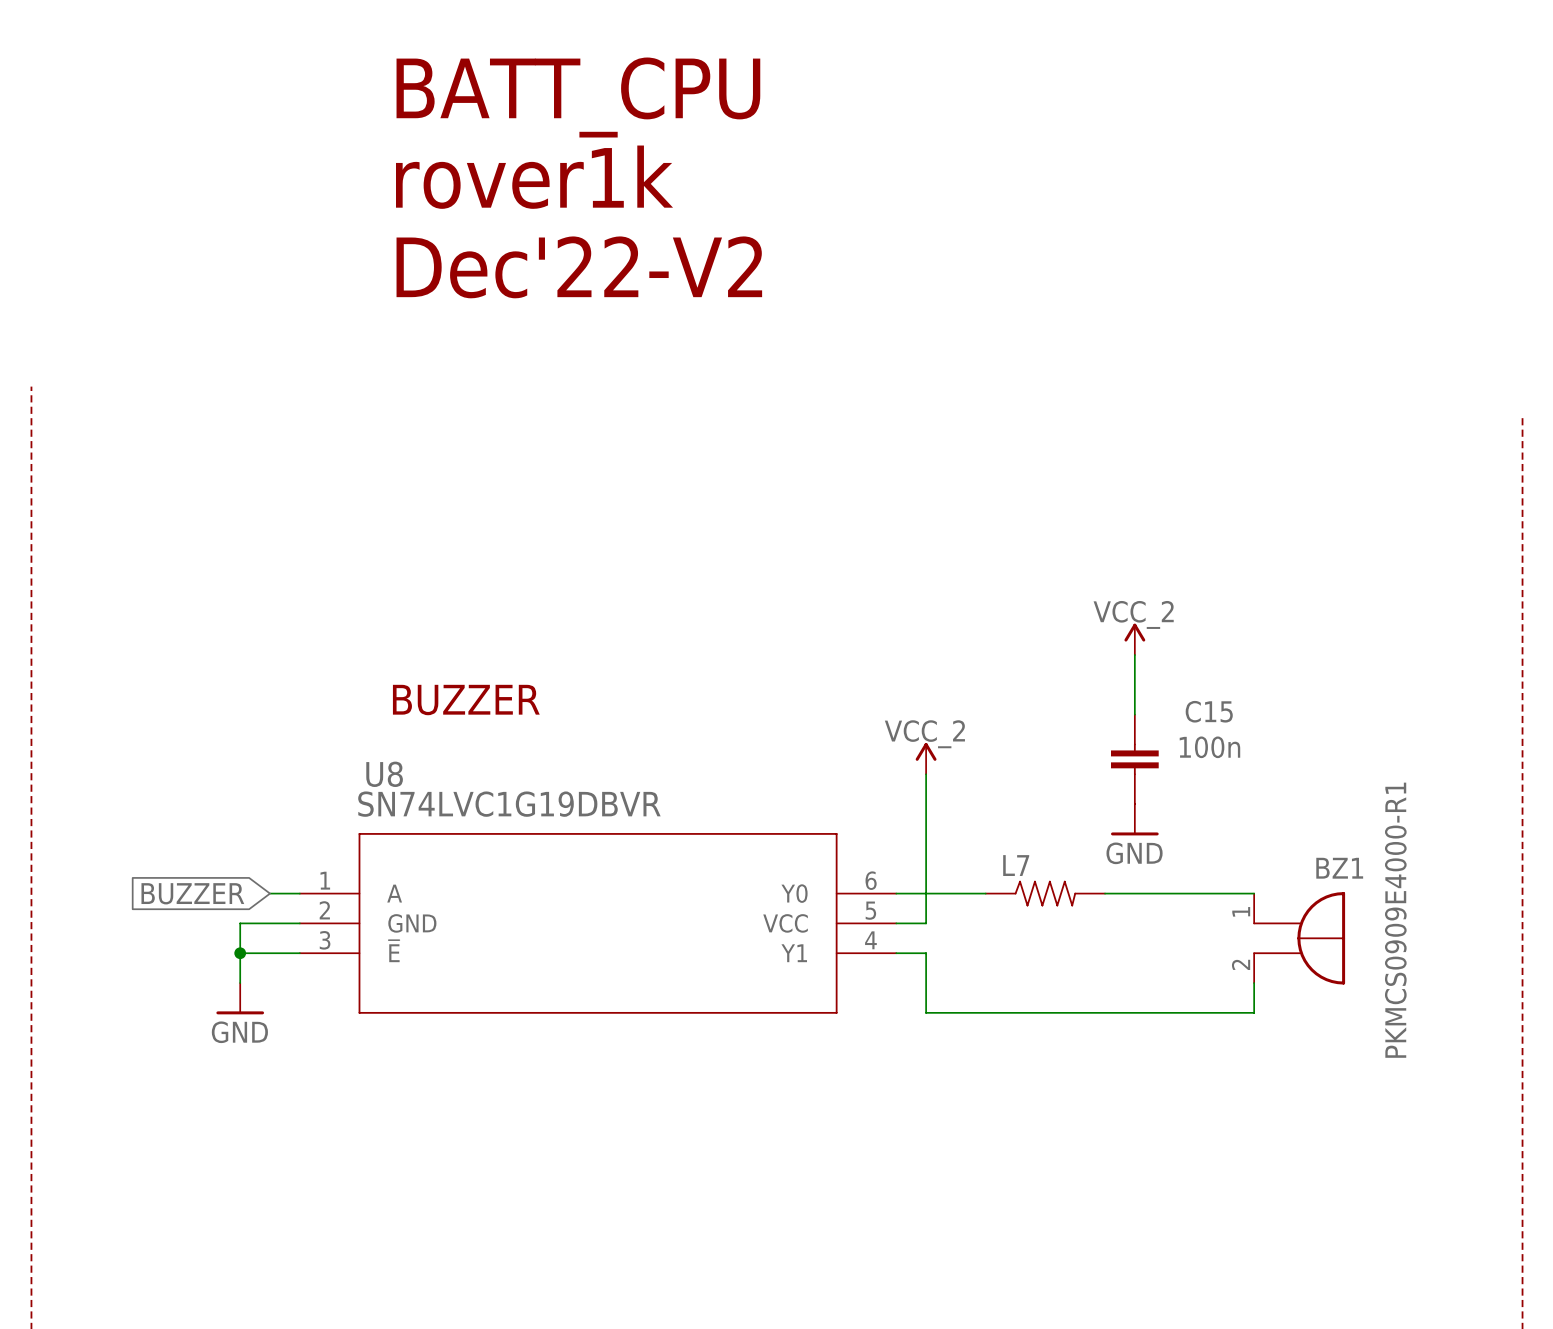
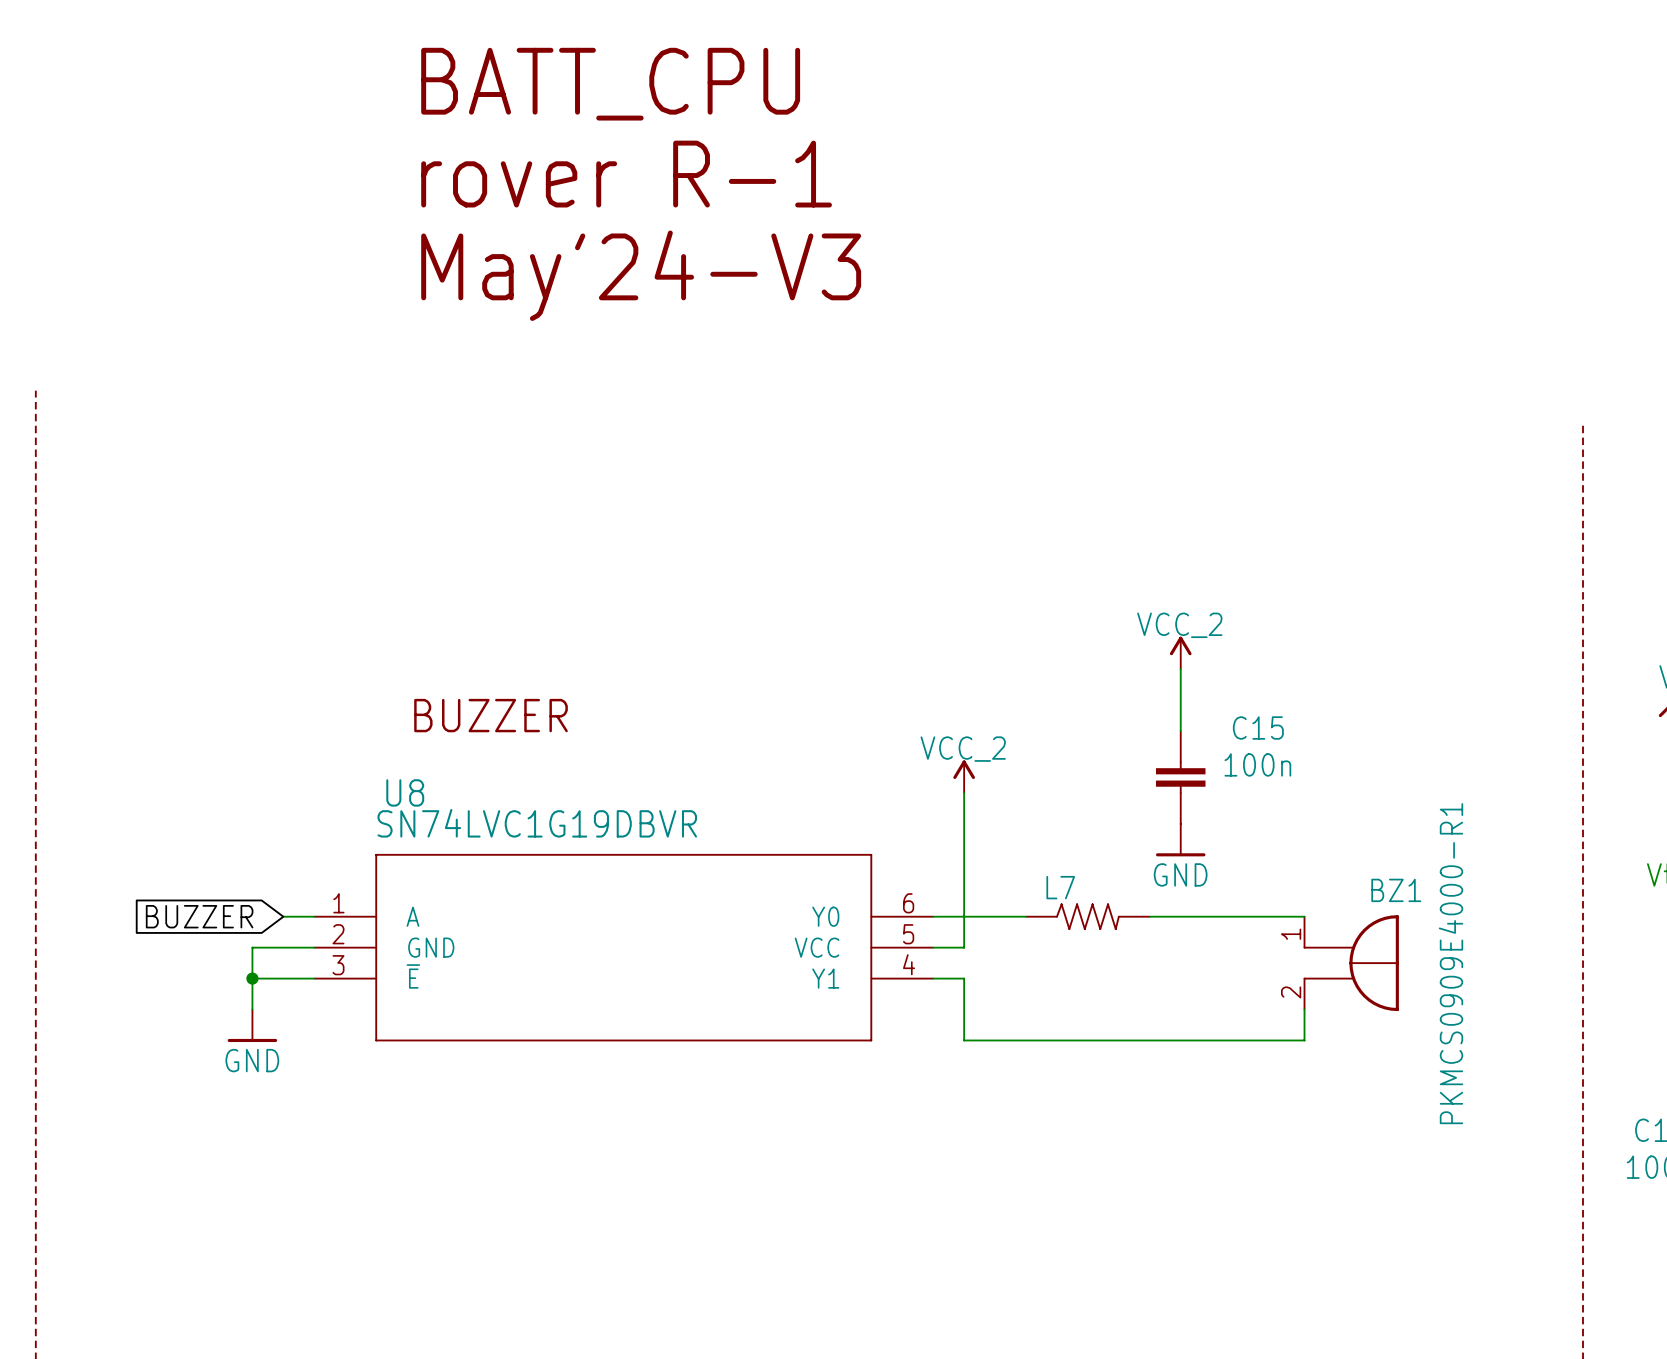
text: rover1k (534, 177) -> rover R-1 (626, 174)
text: Dec'22-V2 (579, 267) -> May'24-V3 (641, 275)

